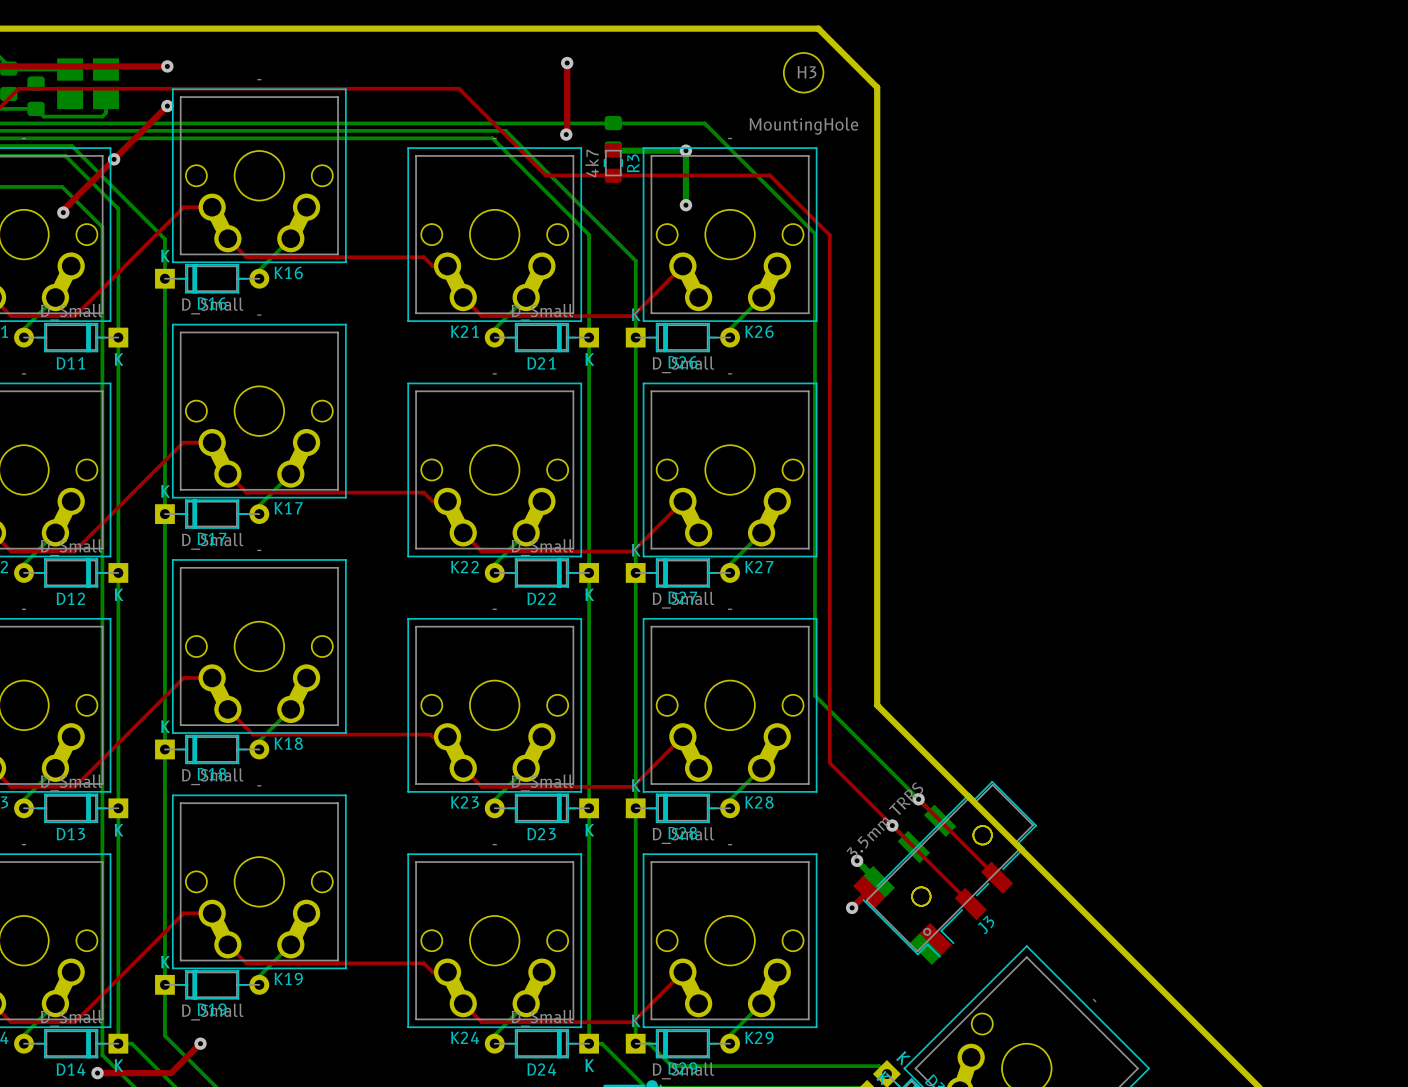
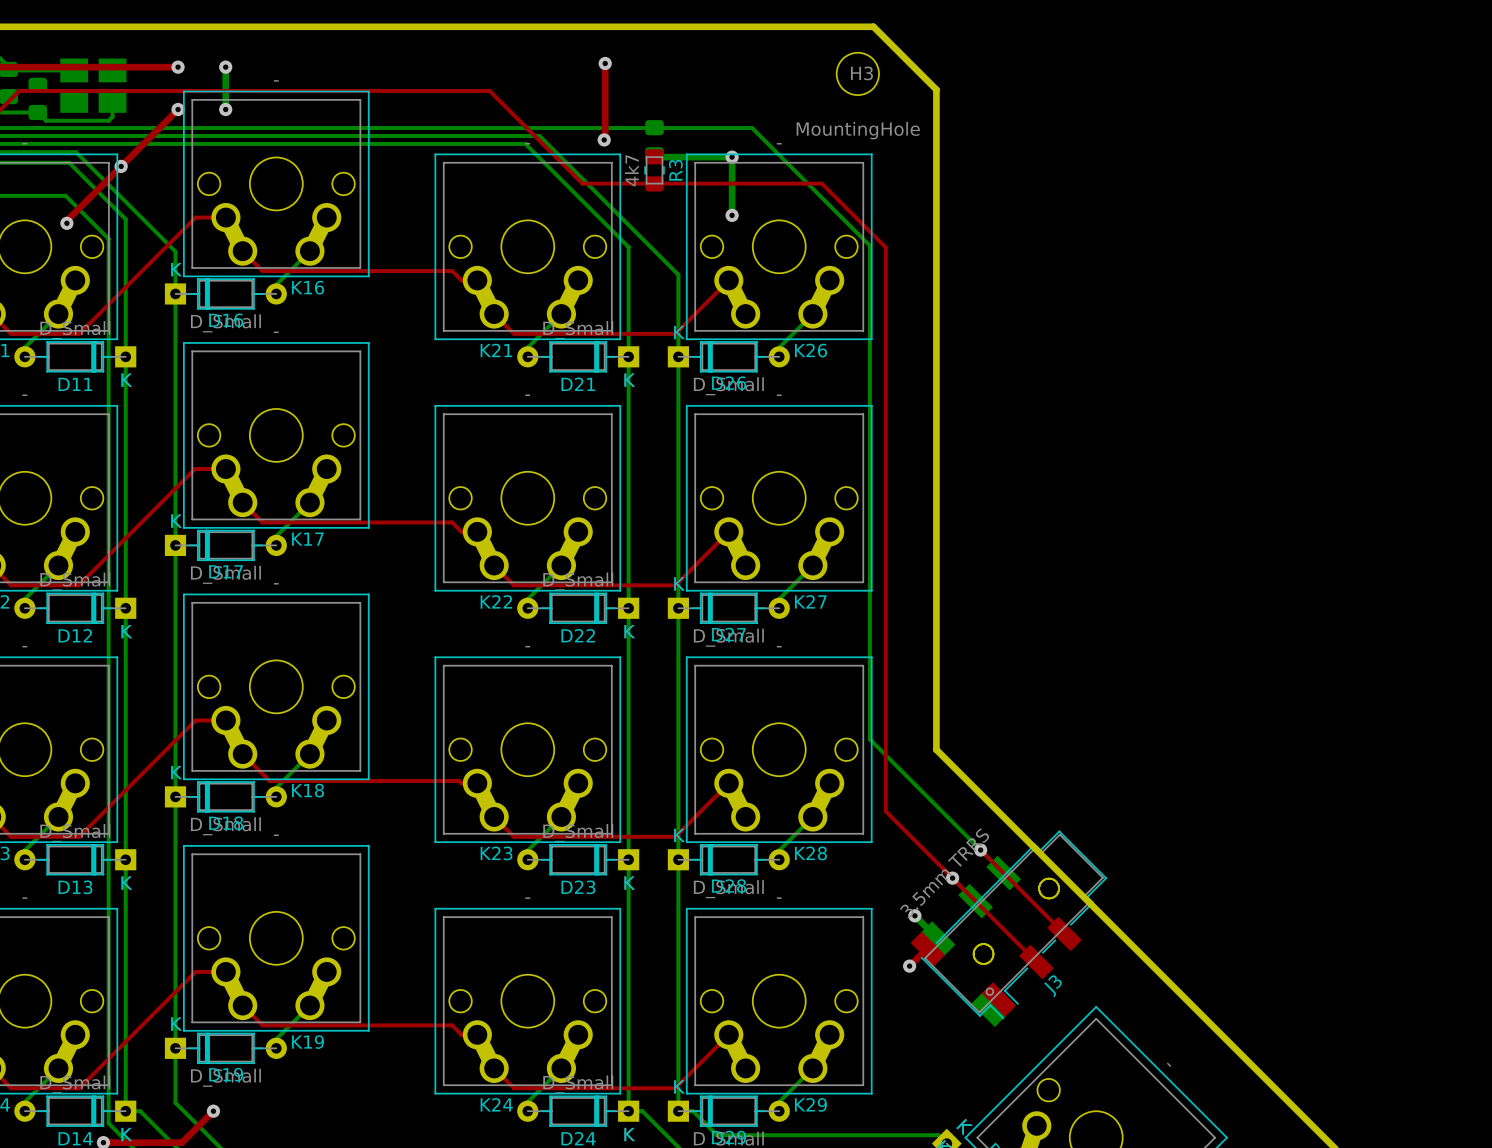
bottom track: none -> (225, 67) (225, 109)
via: none -> (225, 67)
via: none -> (225, 109)

